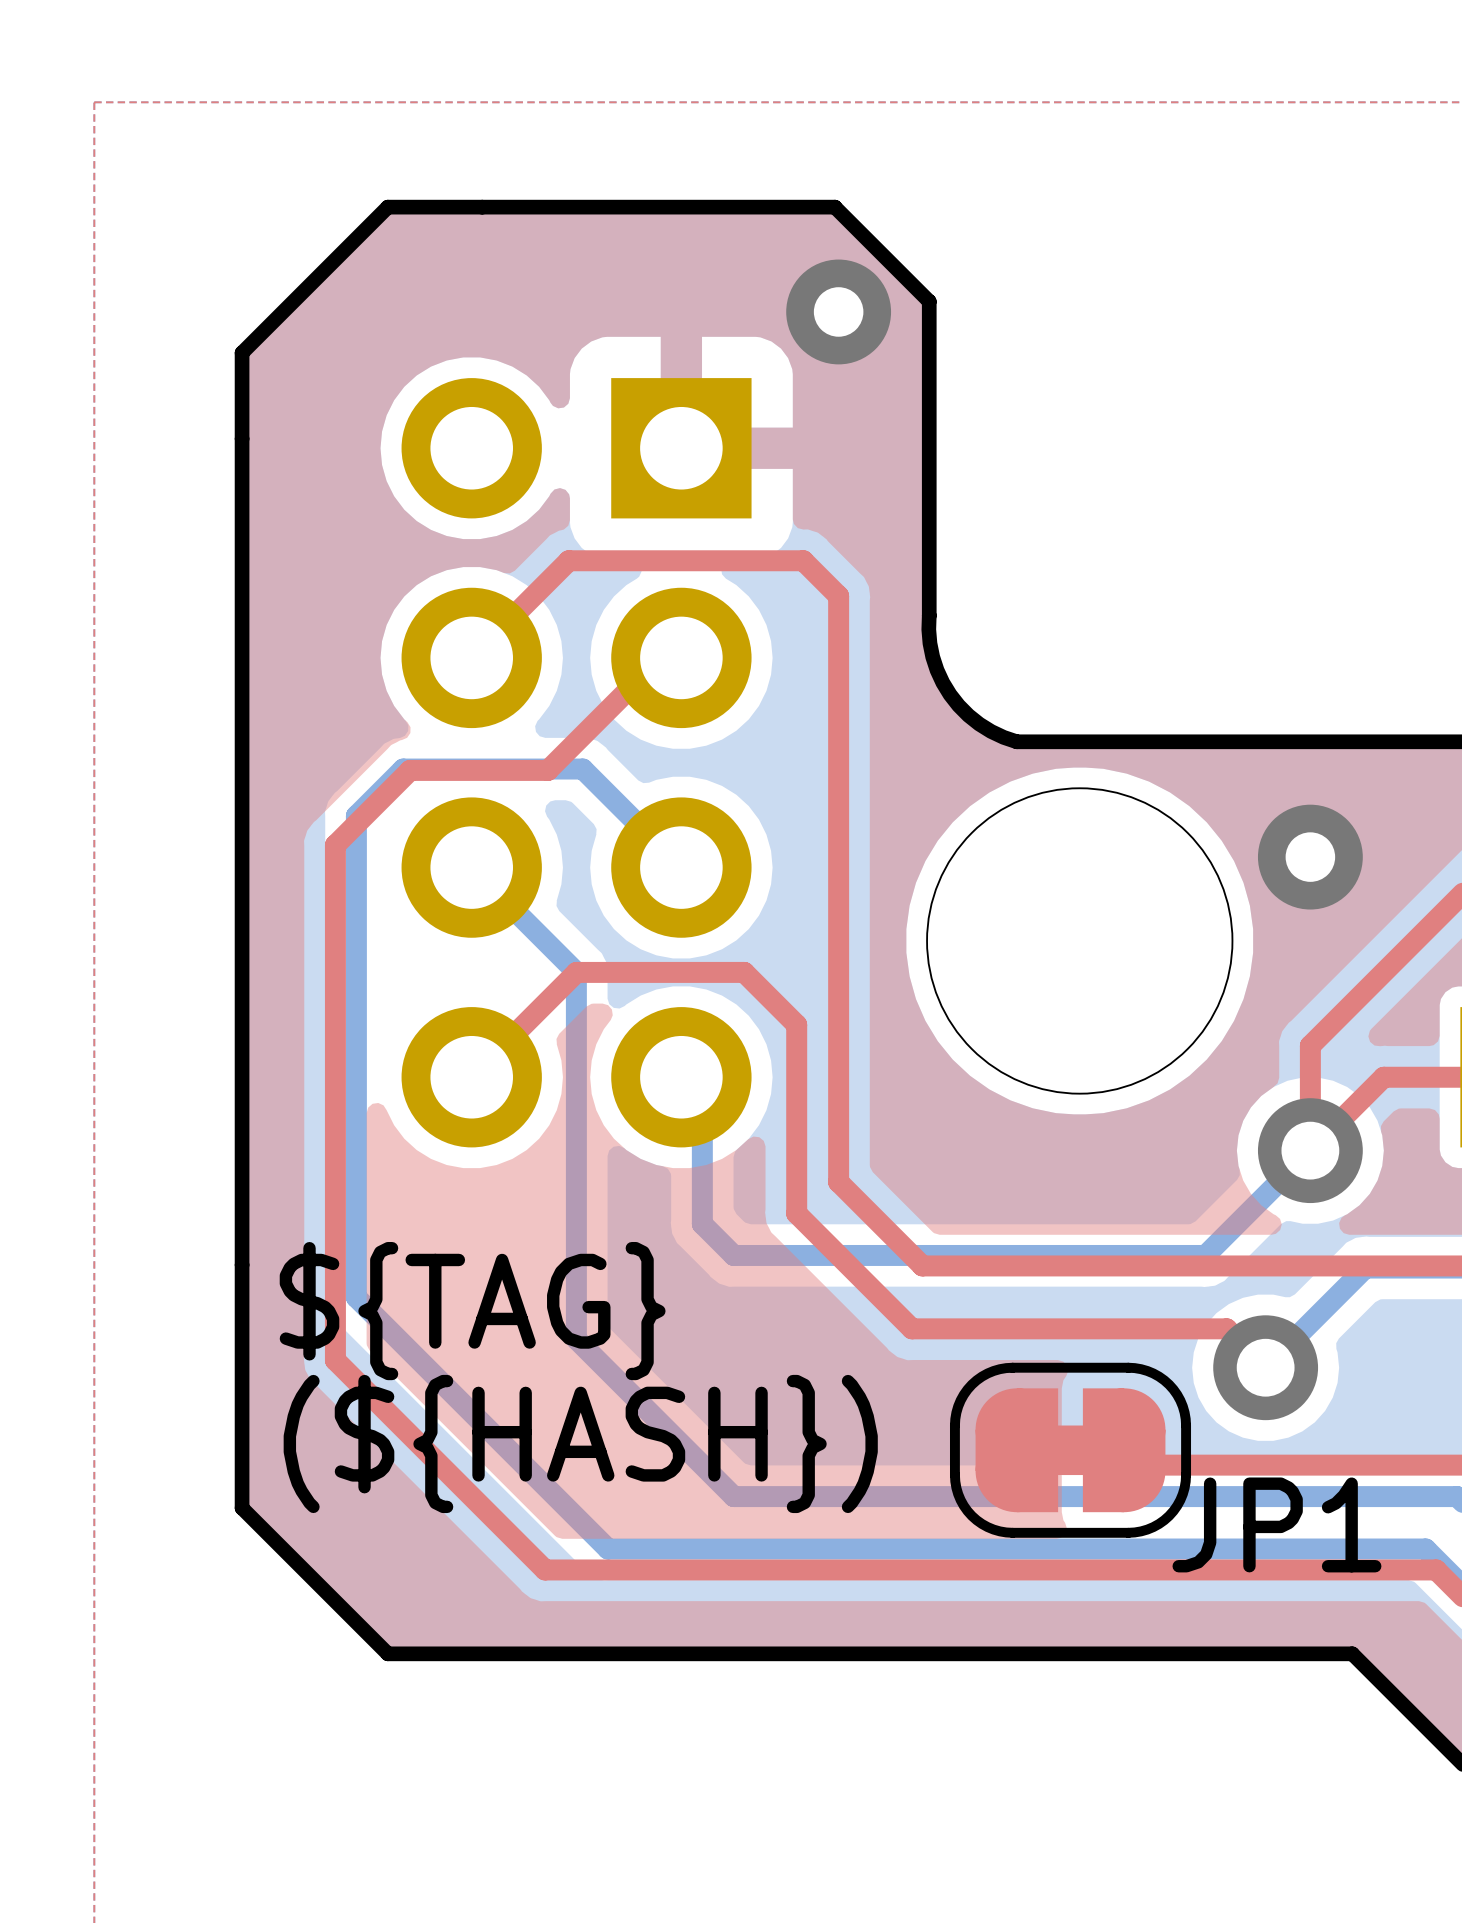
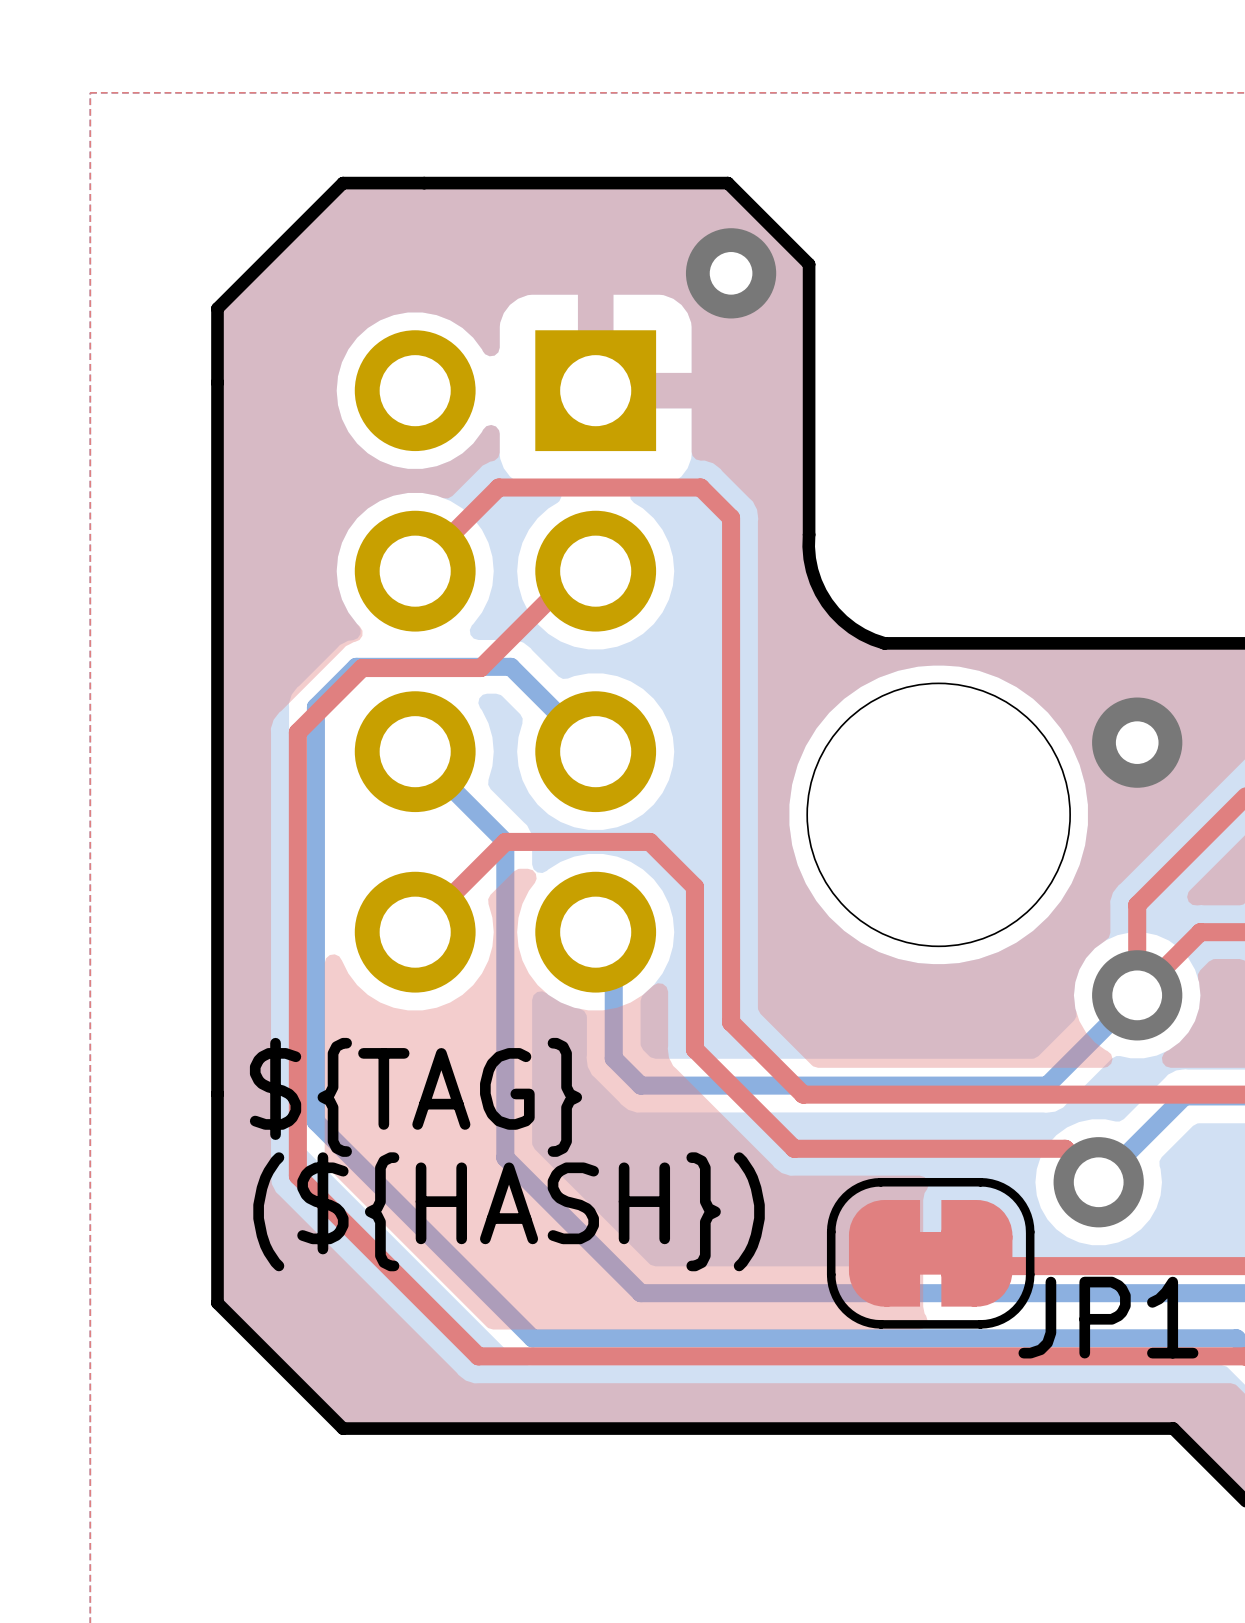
text position: ${TAG} (472, 1311) -> ${TAG} (415, 1097)
text position: (${HASH}) (580, 1443) -> (${HASH}) (509, 1211)

